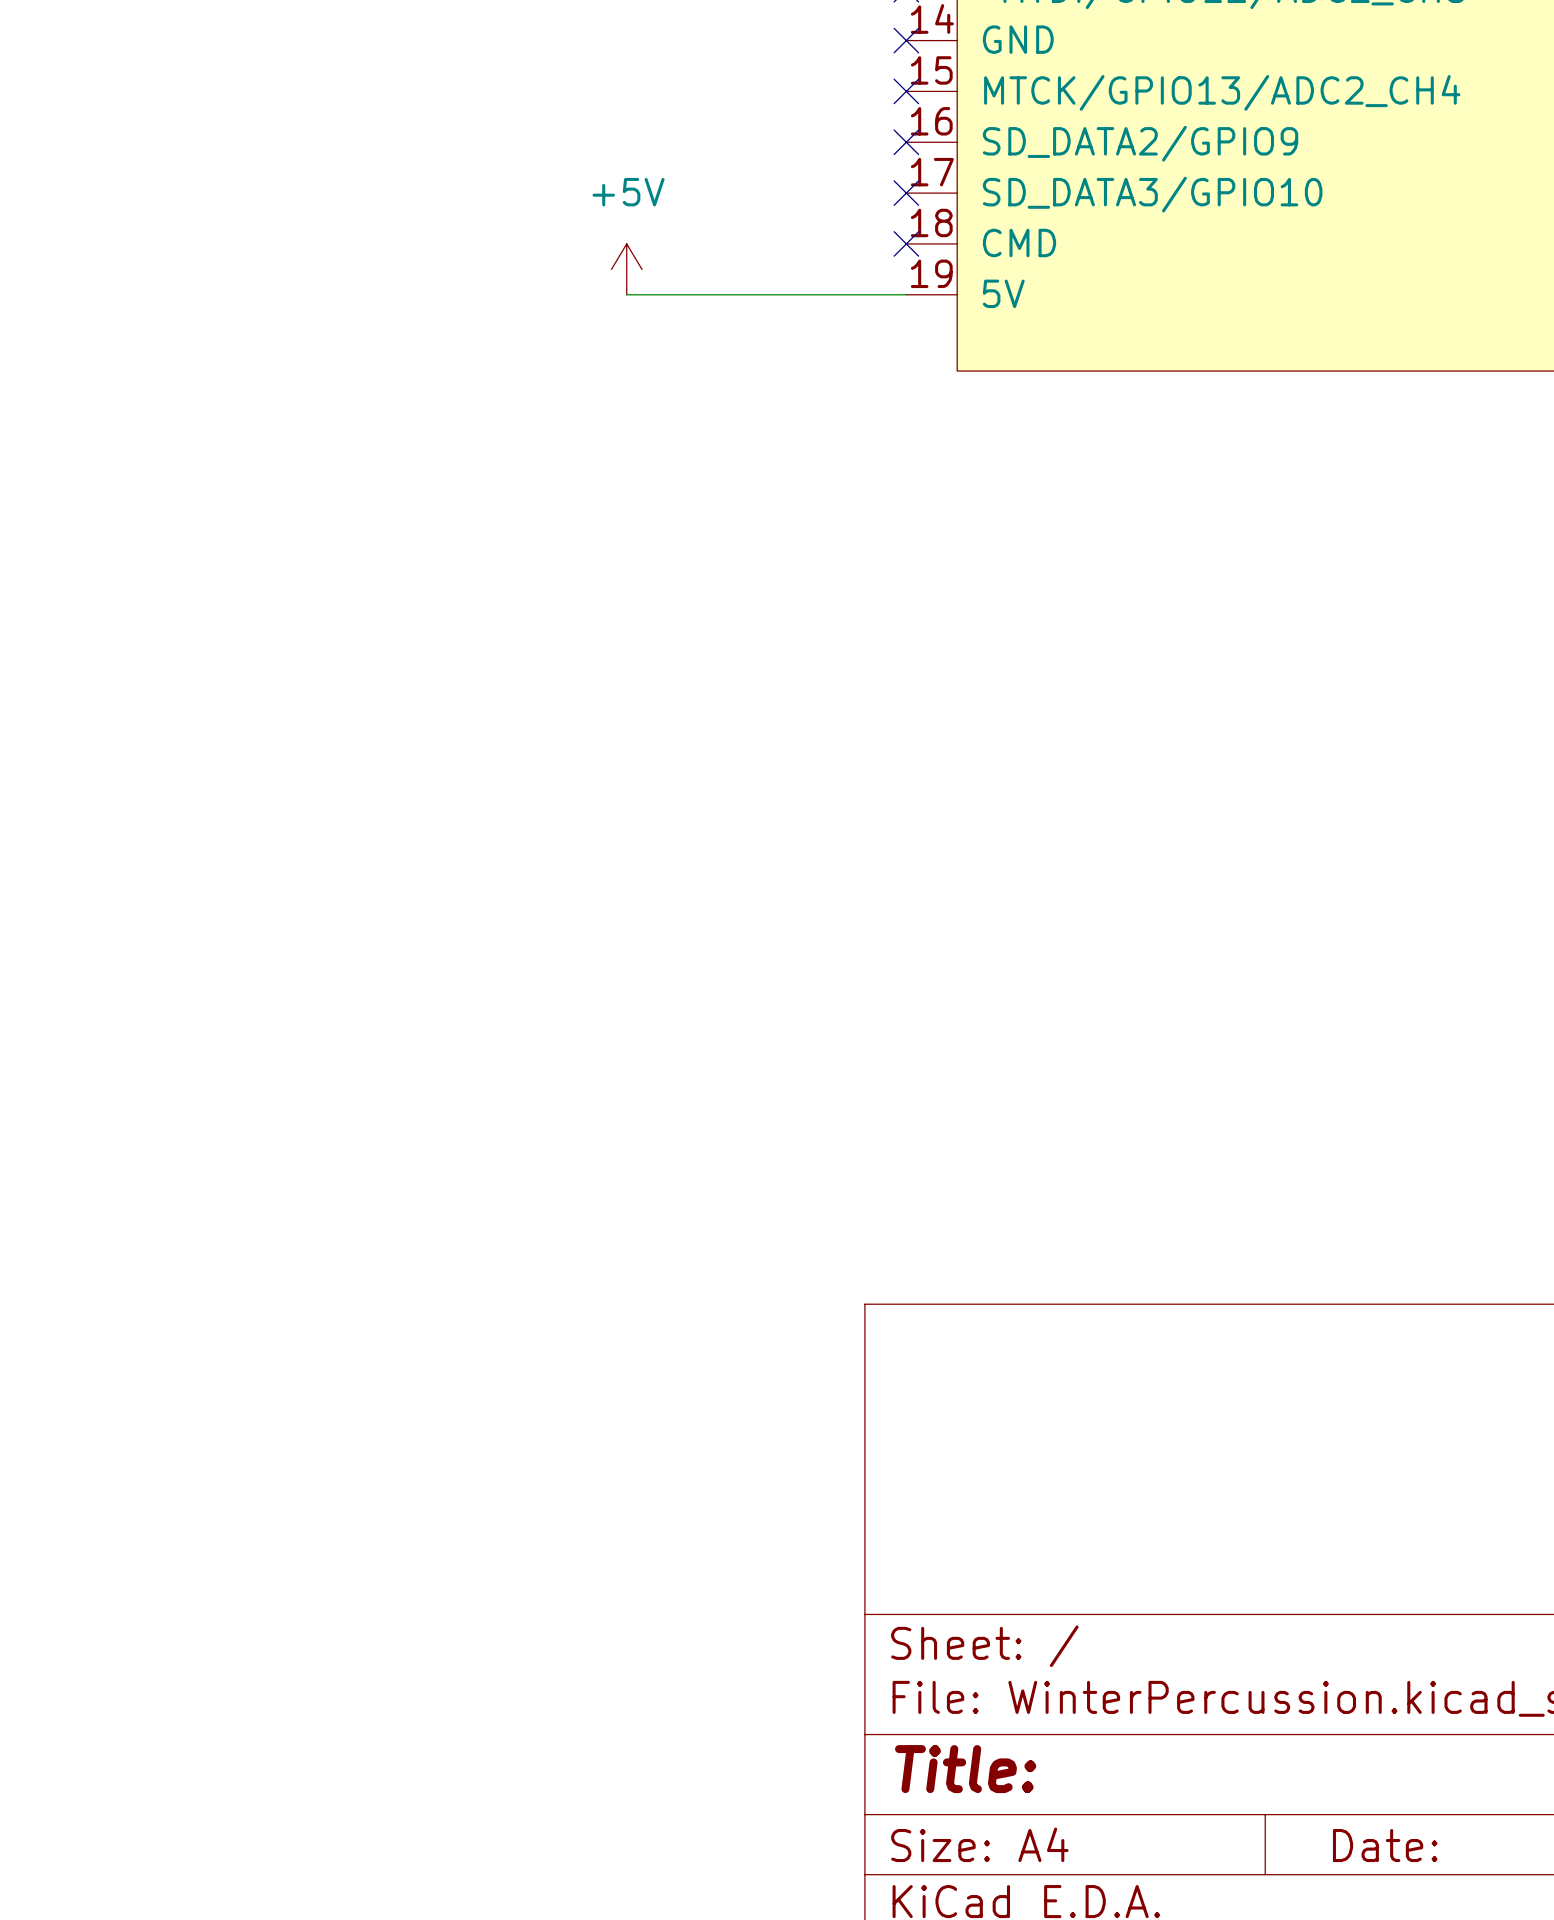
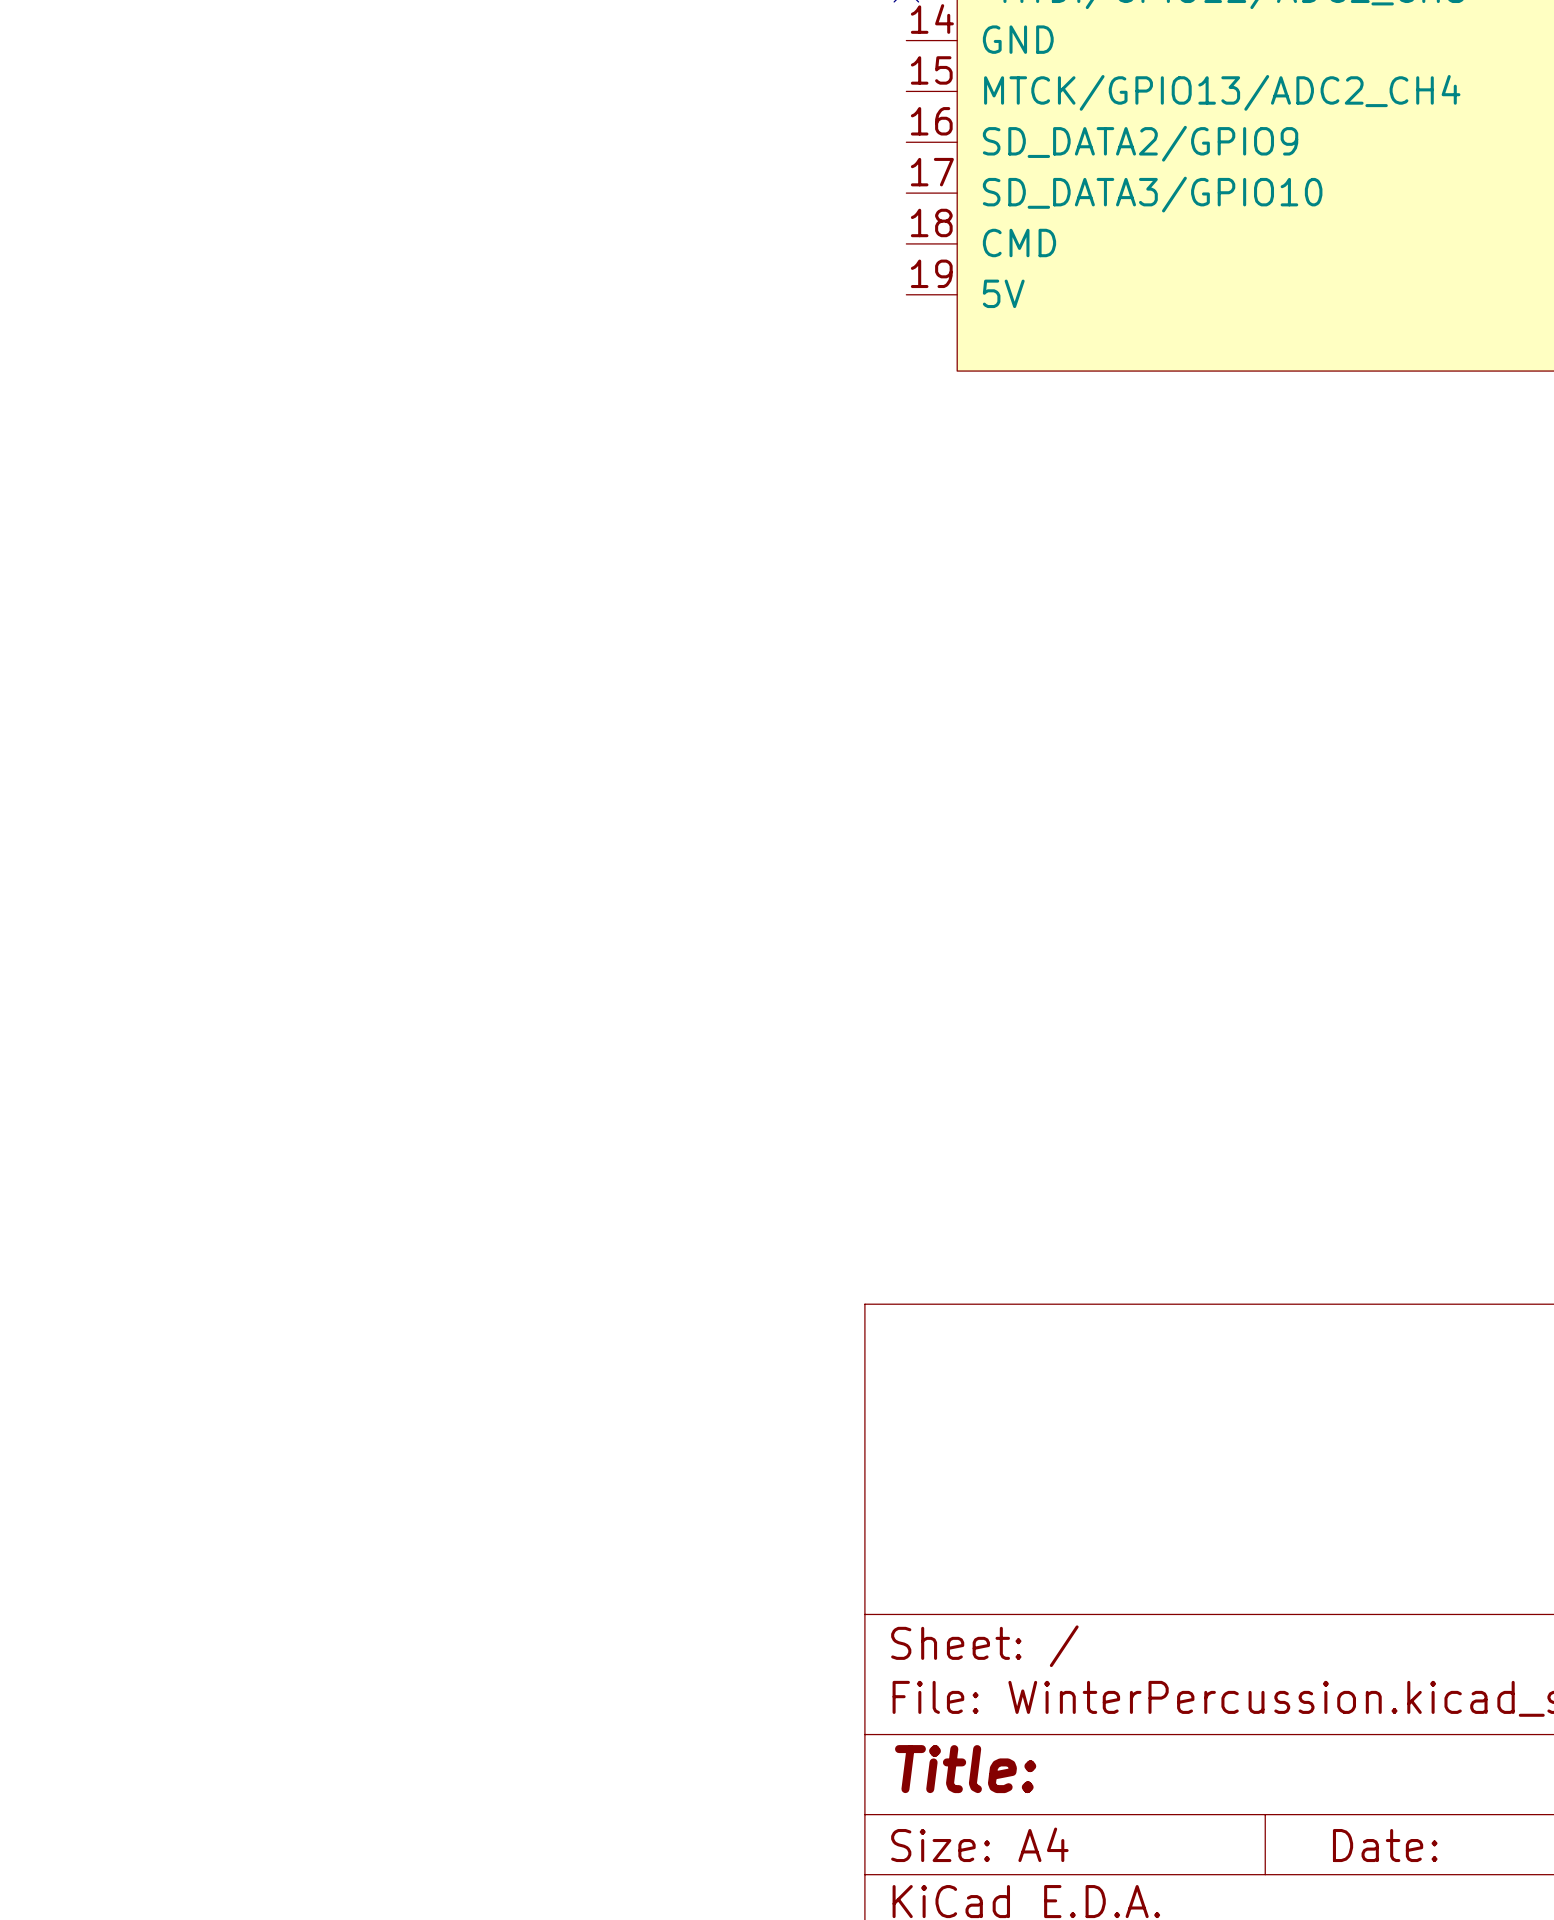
no-connect mark: (906, 40) -> none
no-connect mark: (906, 91) -> none
no-connect mark: (906, 142) -> none
no-connect mark: (906, 193) -> none
no-connect mark: (906, 243) -> none
power symbol: +5V (626, 269) -> none
wire: (626, 294) (906, 294) -> none

